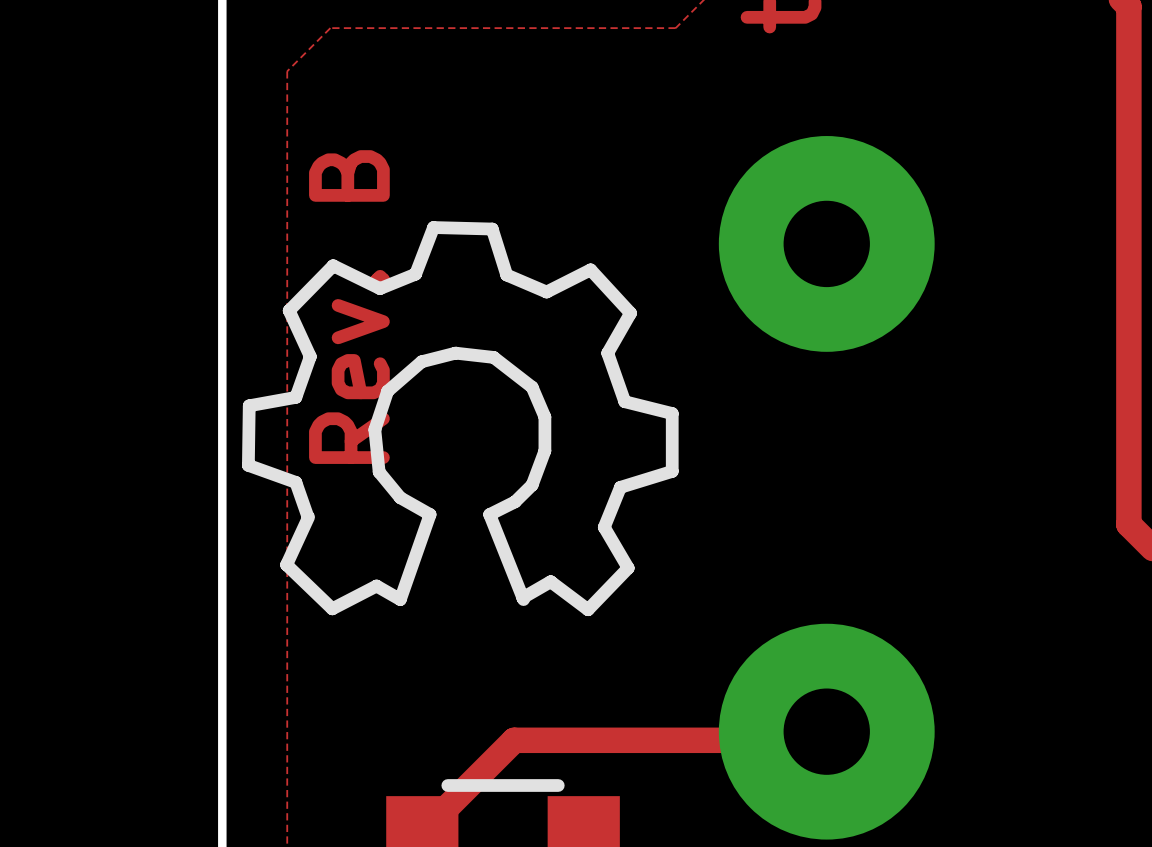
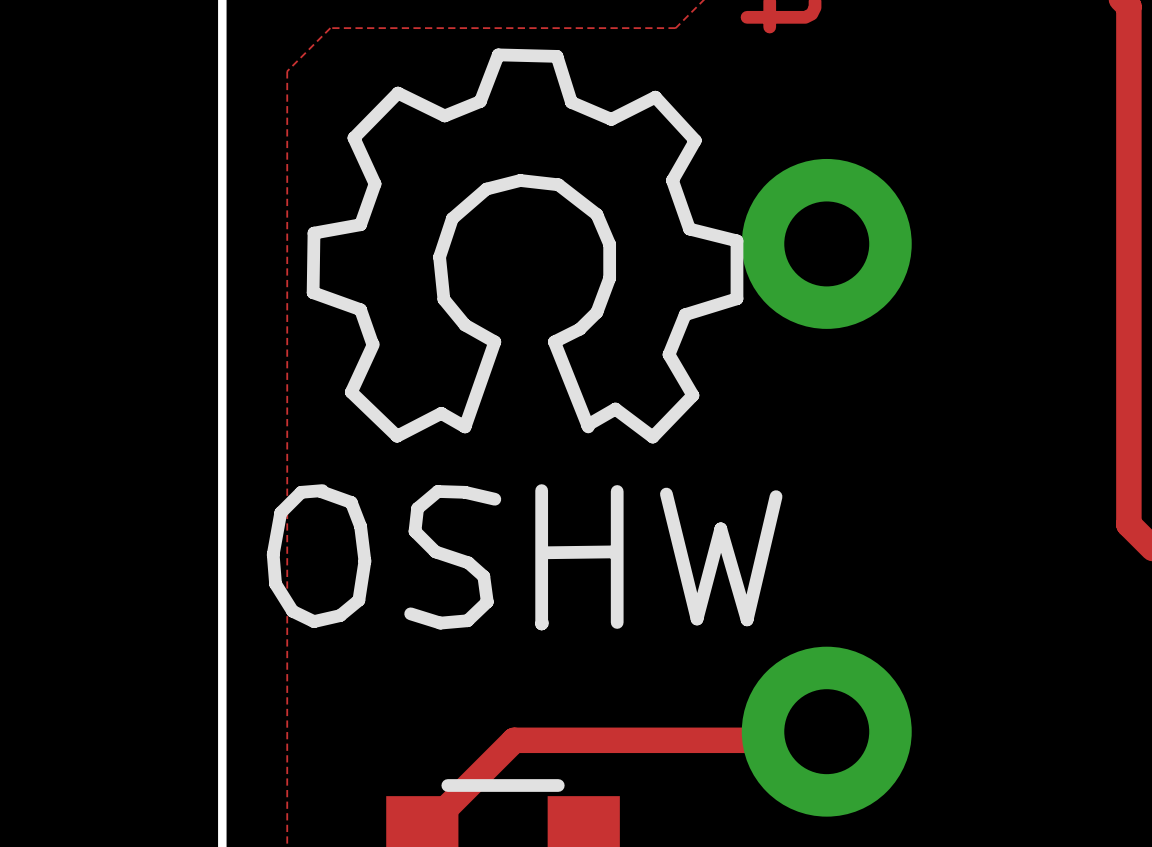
drawing: none -> [266, 48, 783, 631]
part footprint: [718, 136, 935, 352] -> [741, 158, 912, 329]
drawing: [242, 221, 679, 617] -> none
text: Rev. B (349, 307) -> none
part footprint: [718, 623, 935, 840] -> [741, 646, 912, 817]

